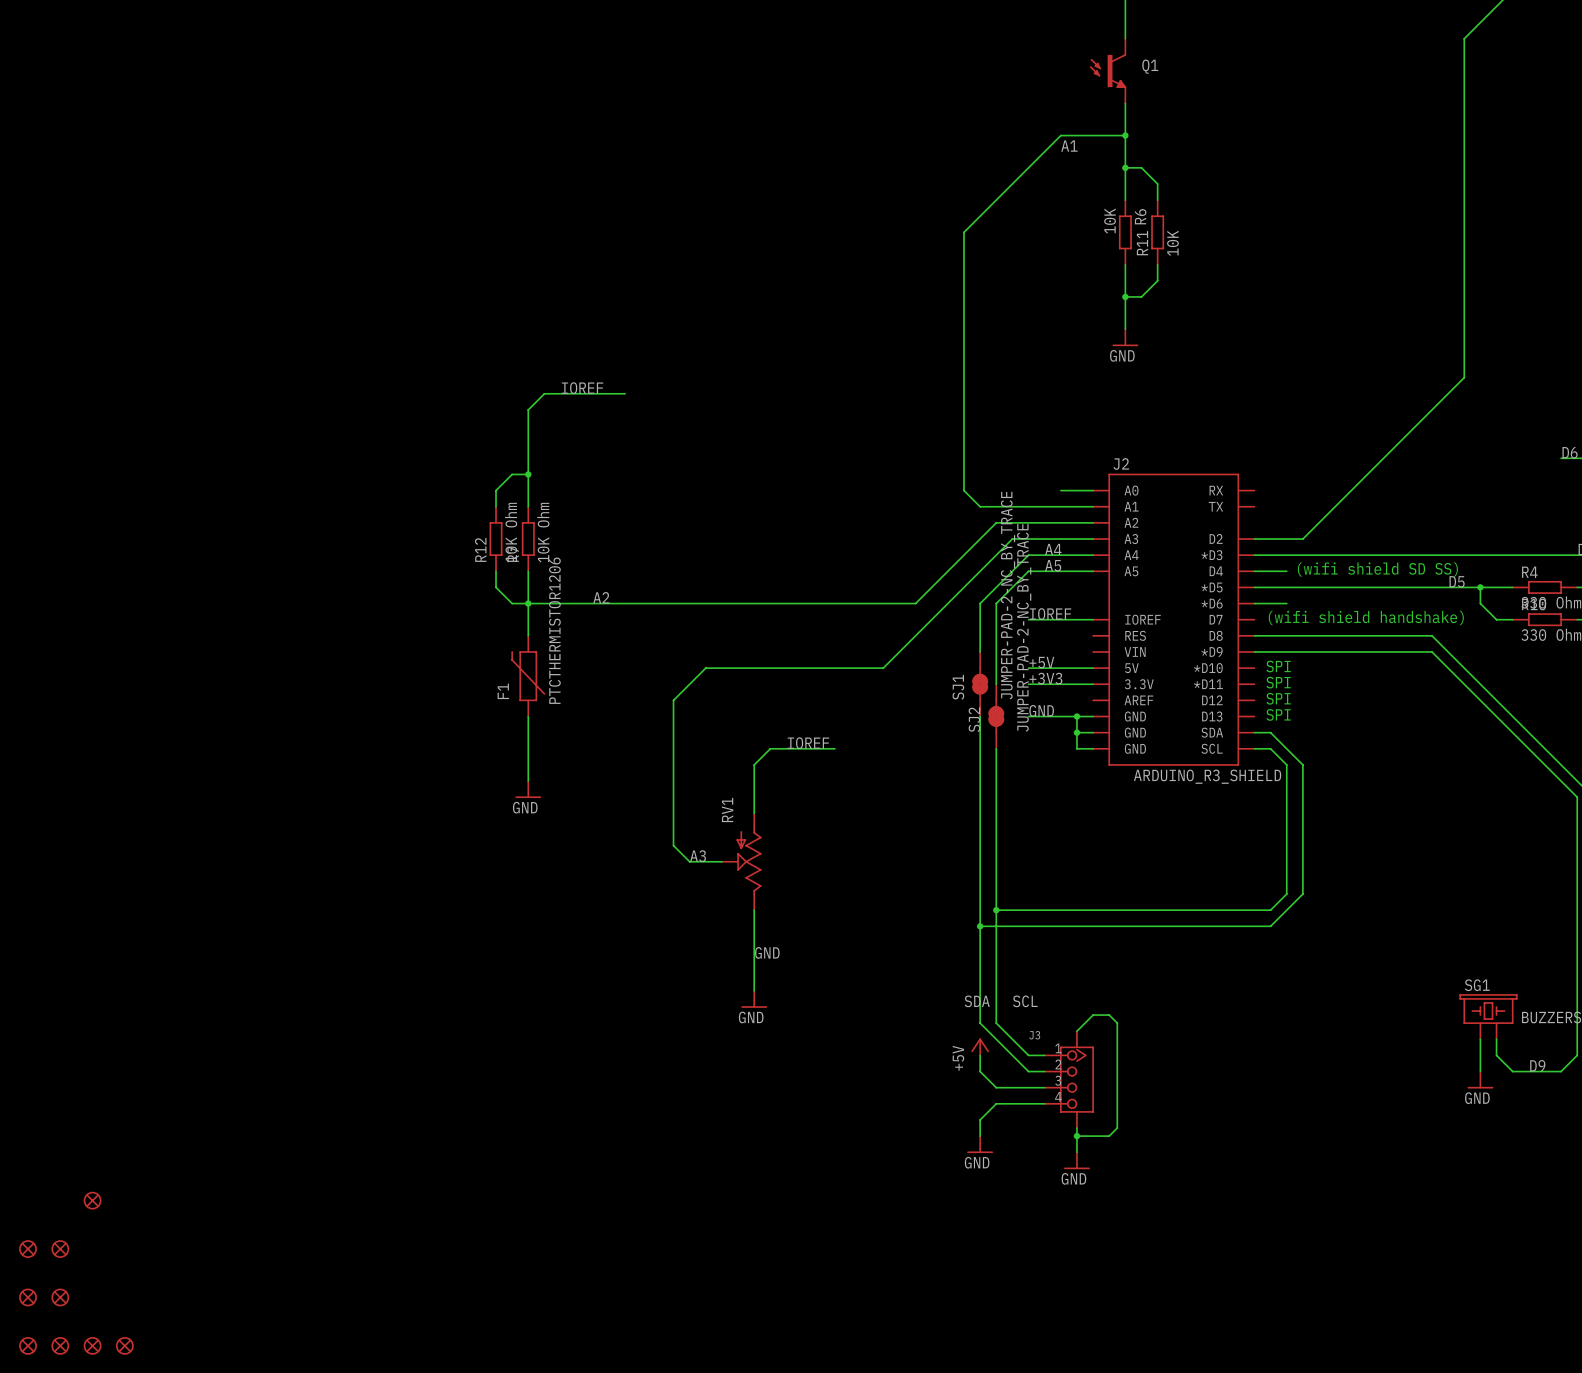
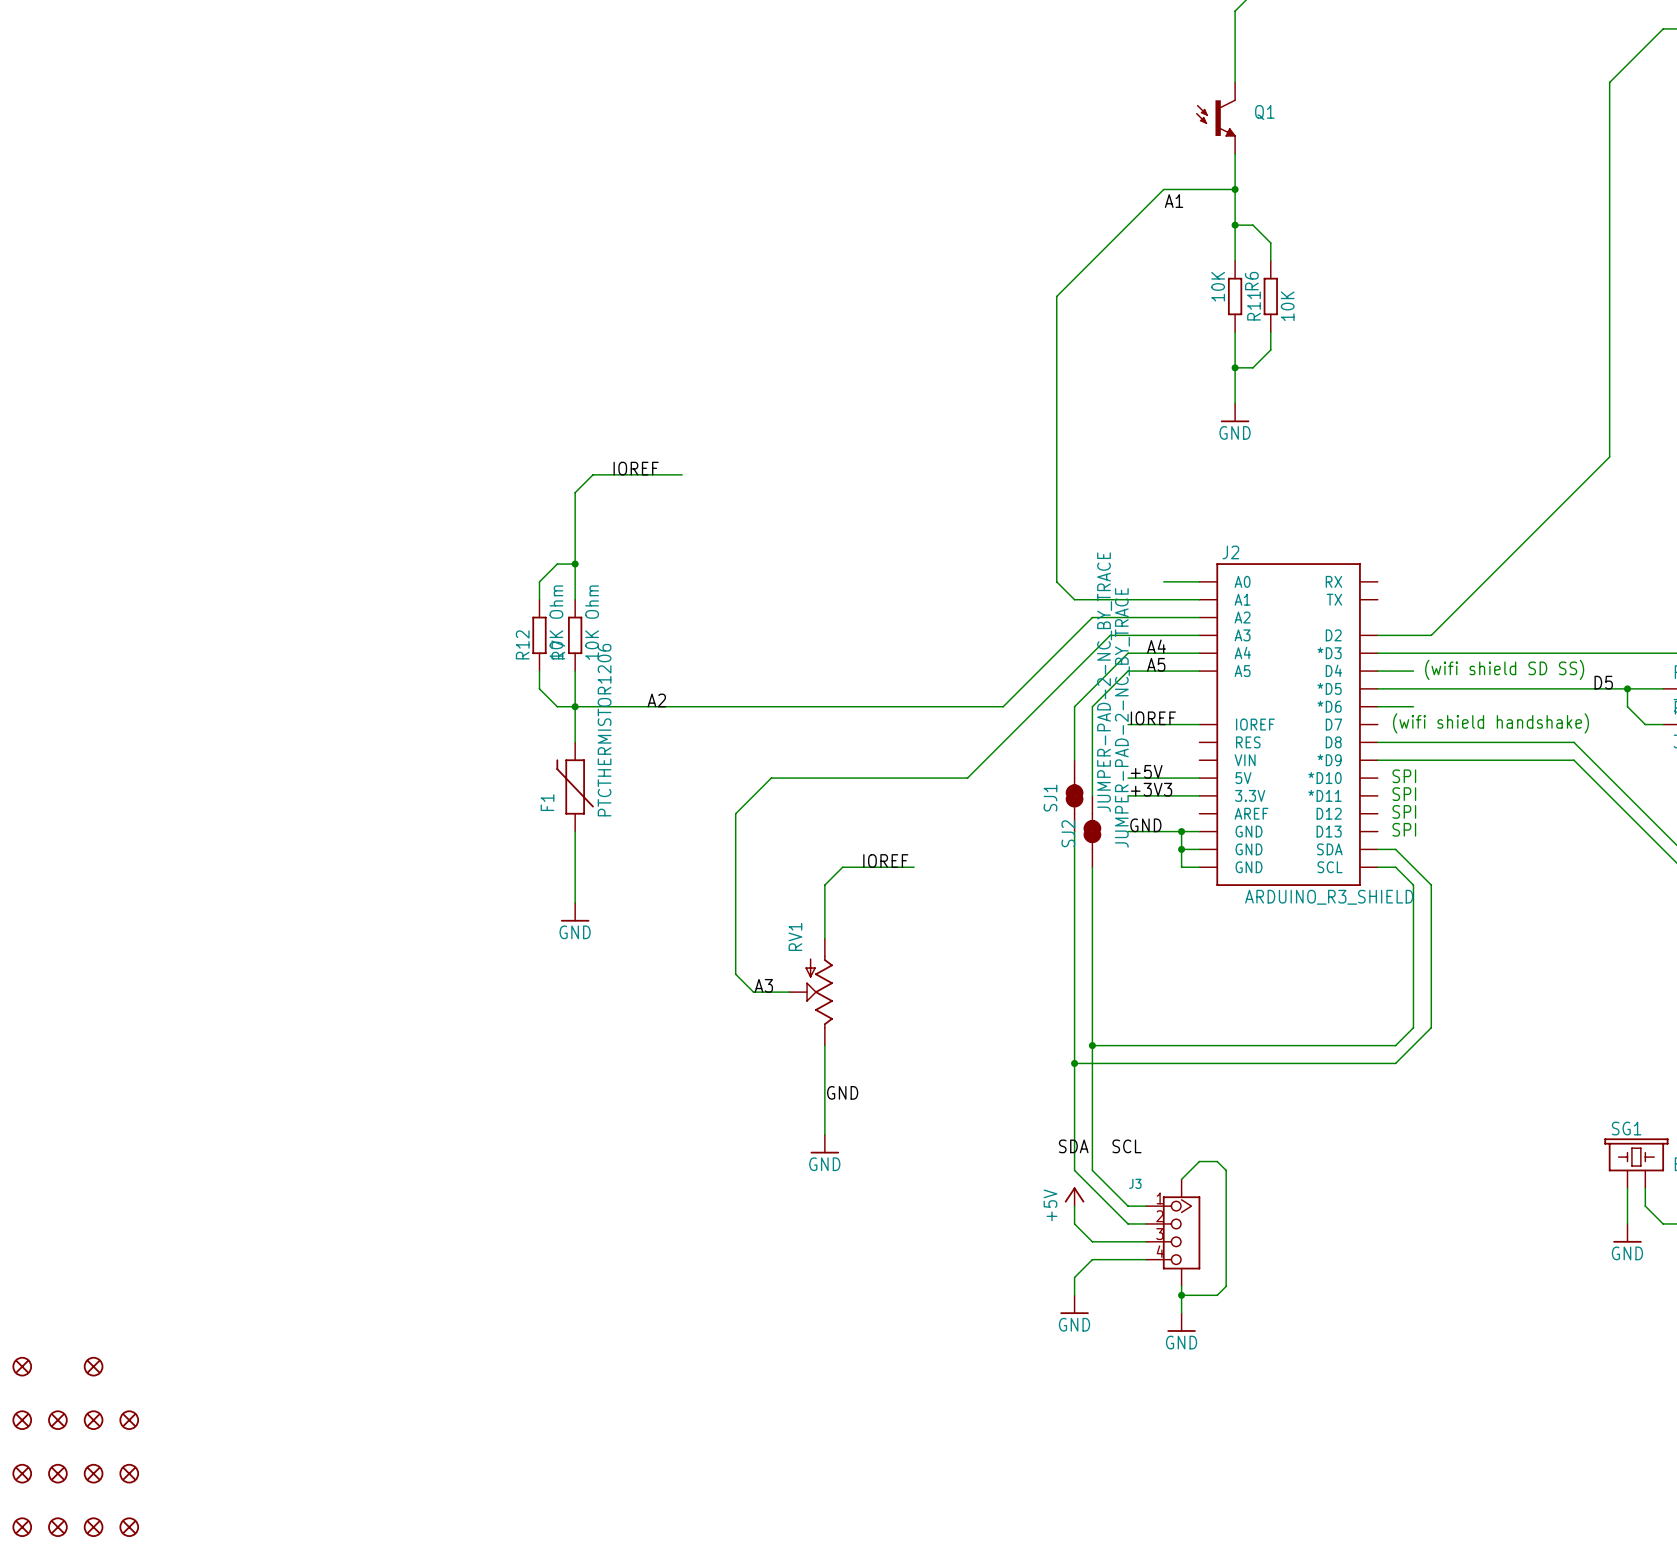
part: none -> (22, 1366)
part: none -> (93, 1420)
part: none -> (129, 1420)
part: none -> (93, 1473)
part: none -> (129, 1473)

